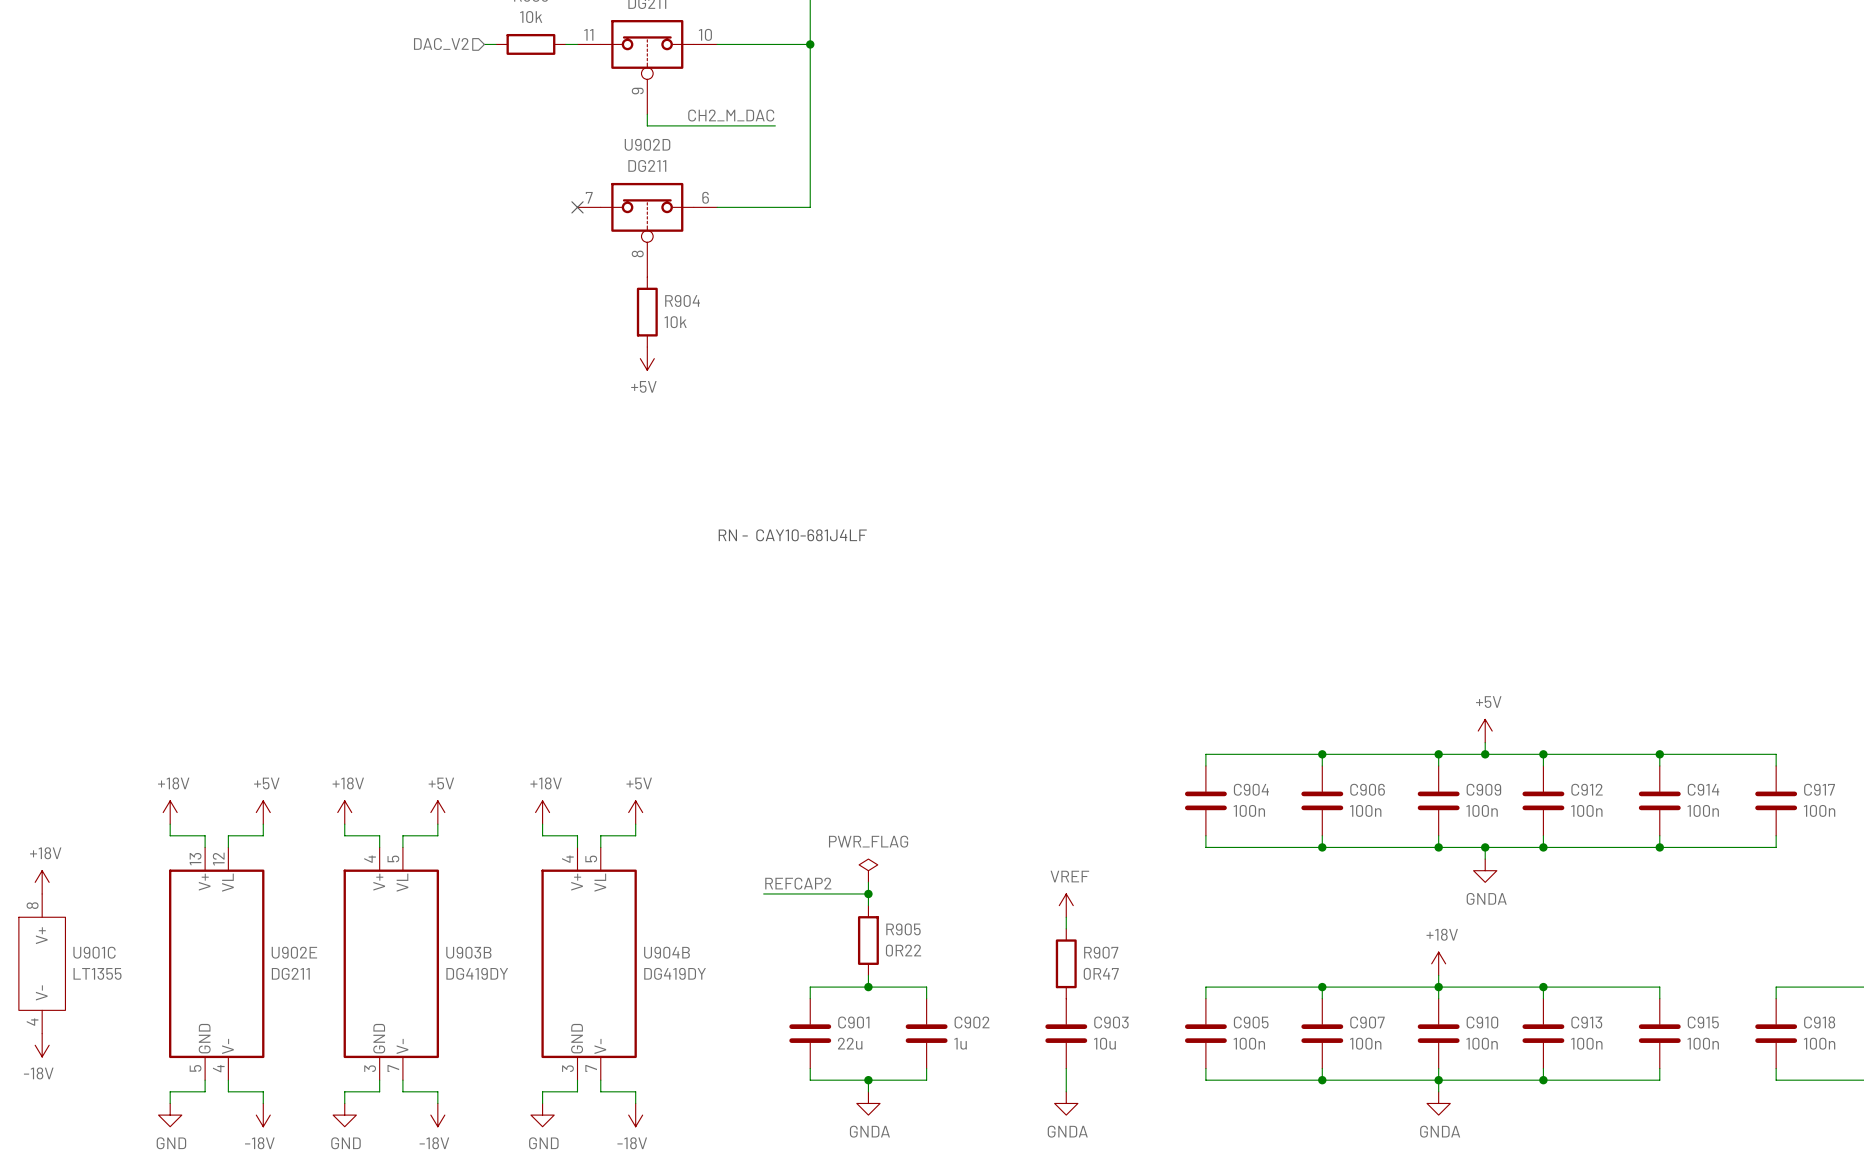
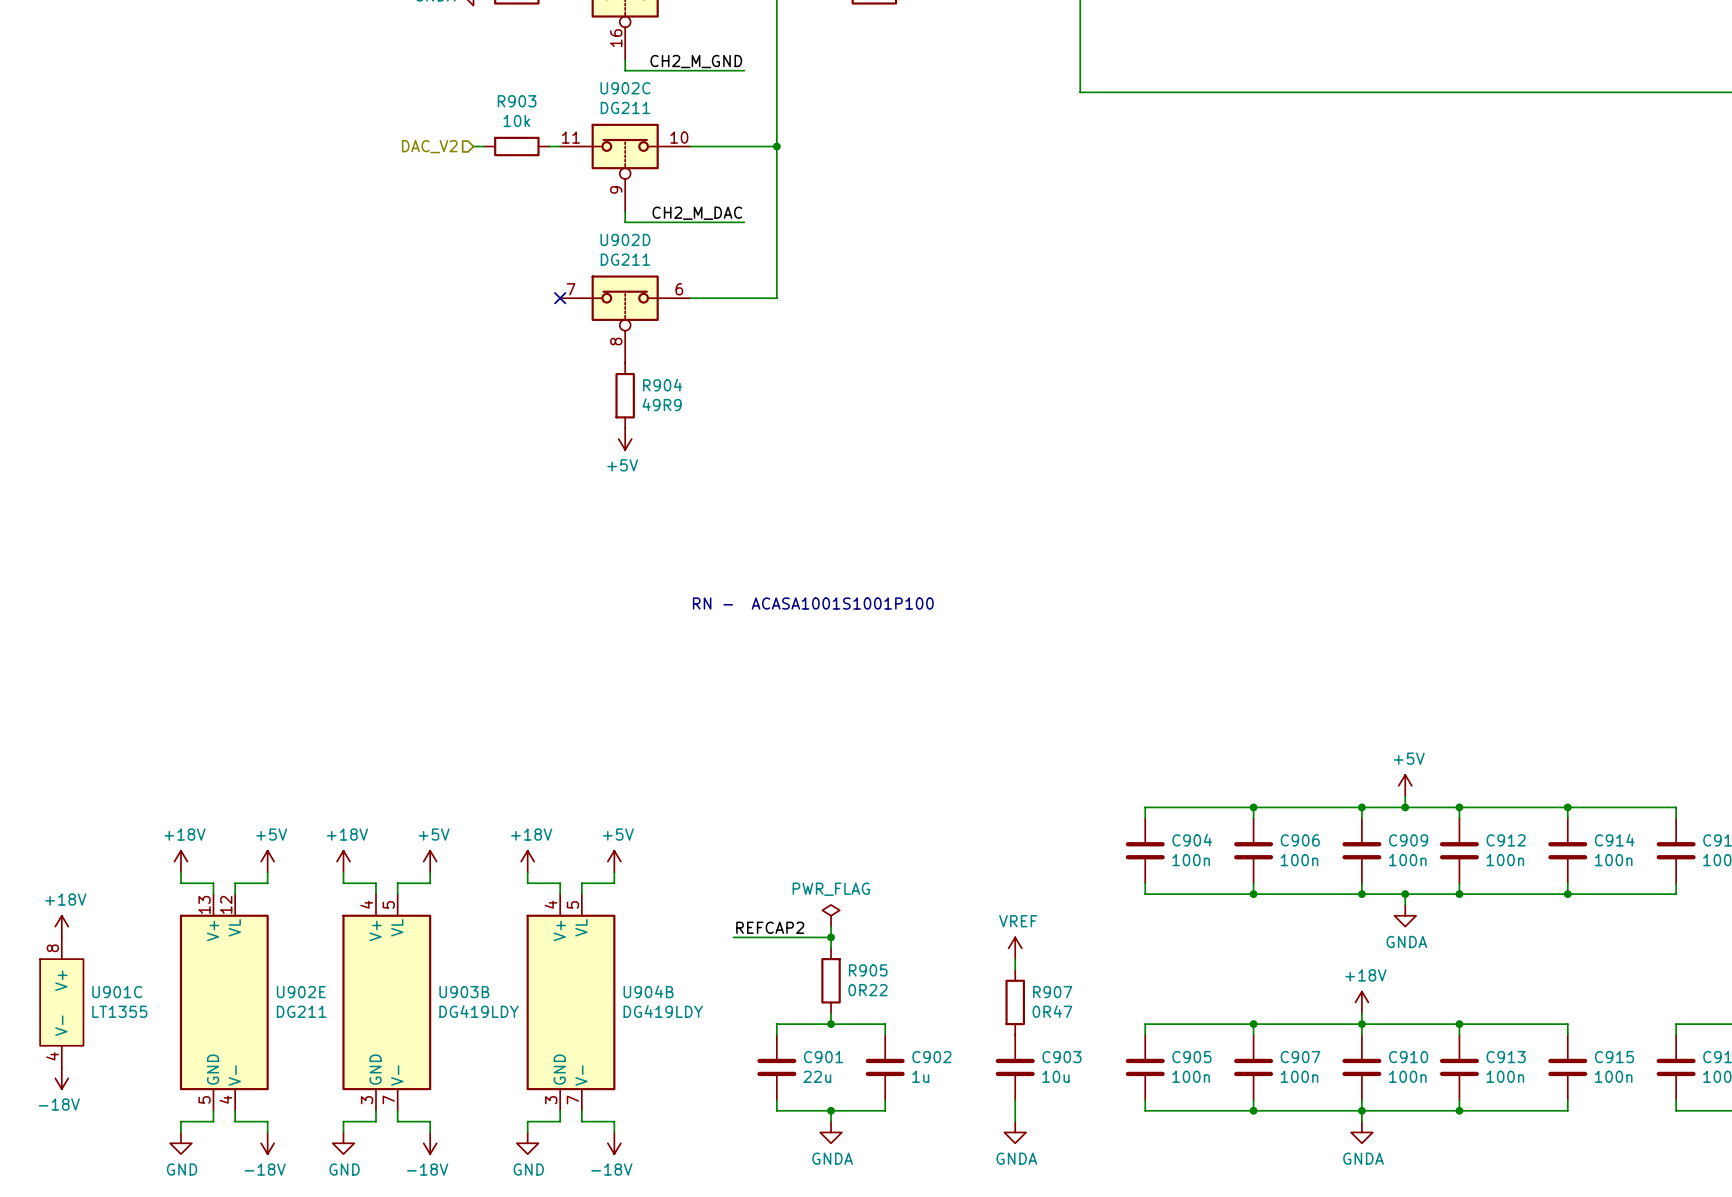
R904 value: 10k (675, 322) -> 49R9 (662, 404)
text: RN - CAY10-681J4LF (792, 535) -> RN - ACASA1001S1001P100 (813, 603)
U903B value: DG419DY (477, 973) -> DG419LDY (479, 1011)
U904B value: DG419DY (675, 973) -> DG419LDY (663, 1011)

